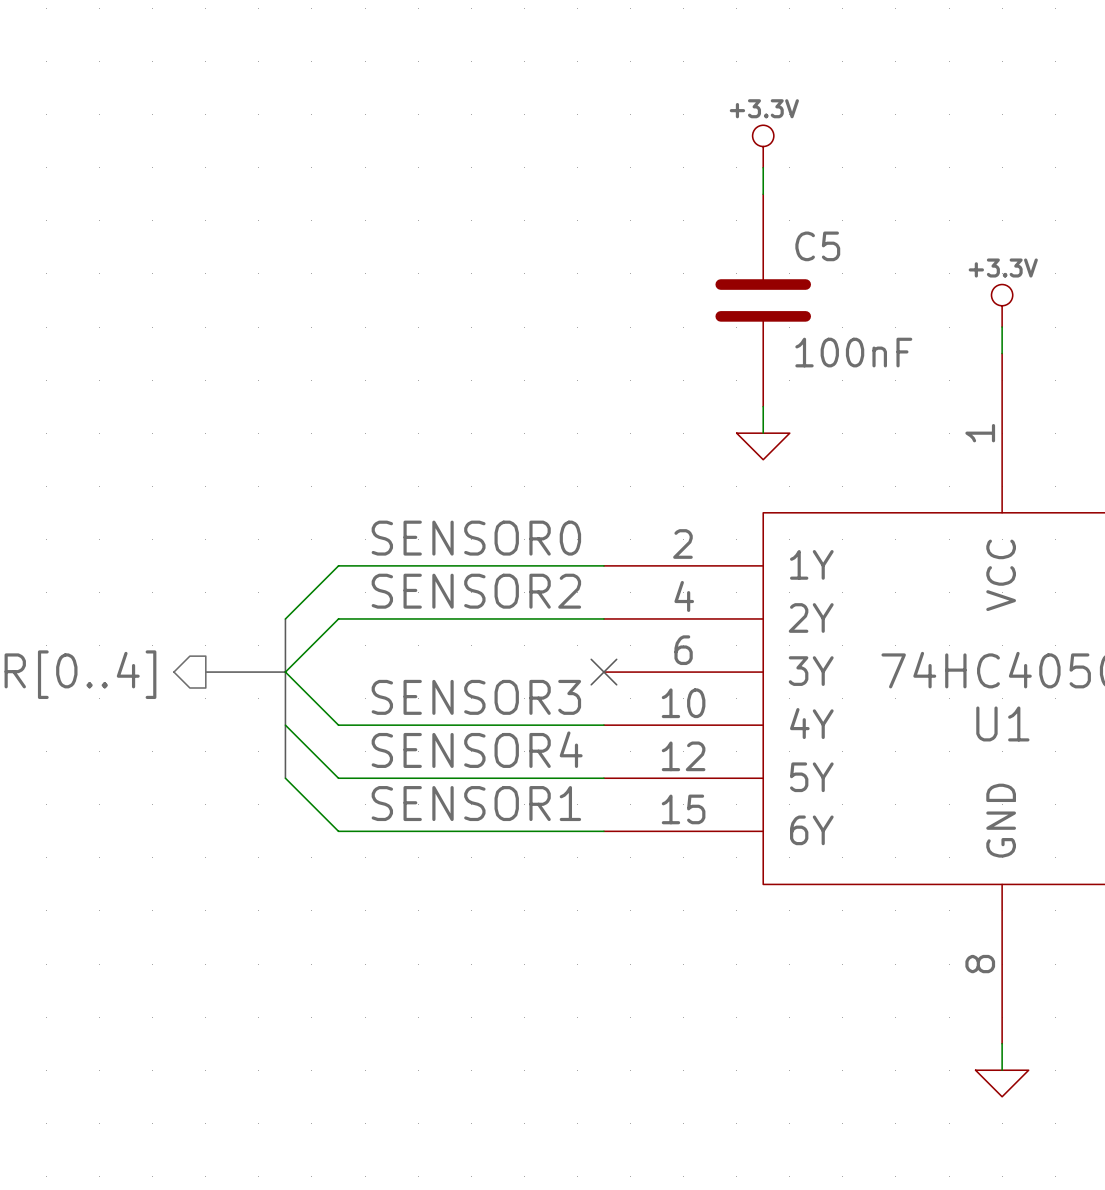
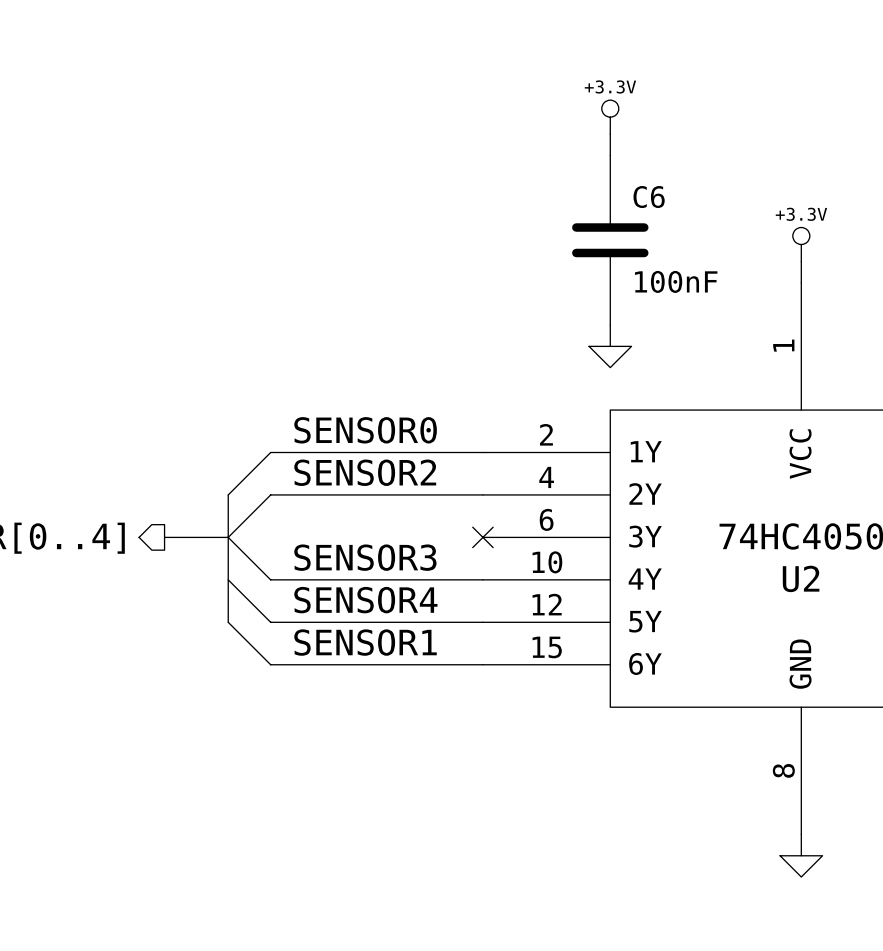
C5 name: C5 (817, 246) -> C6 (649, 197)
U1 name: U1 (1002, 723) -> U2 (801, 578)

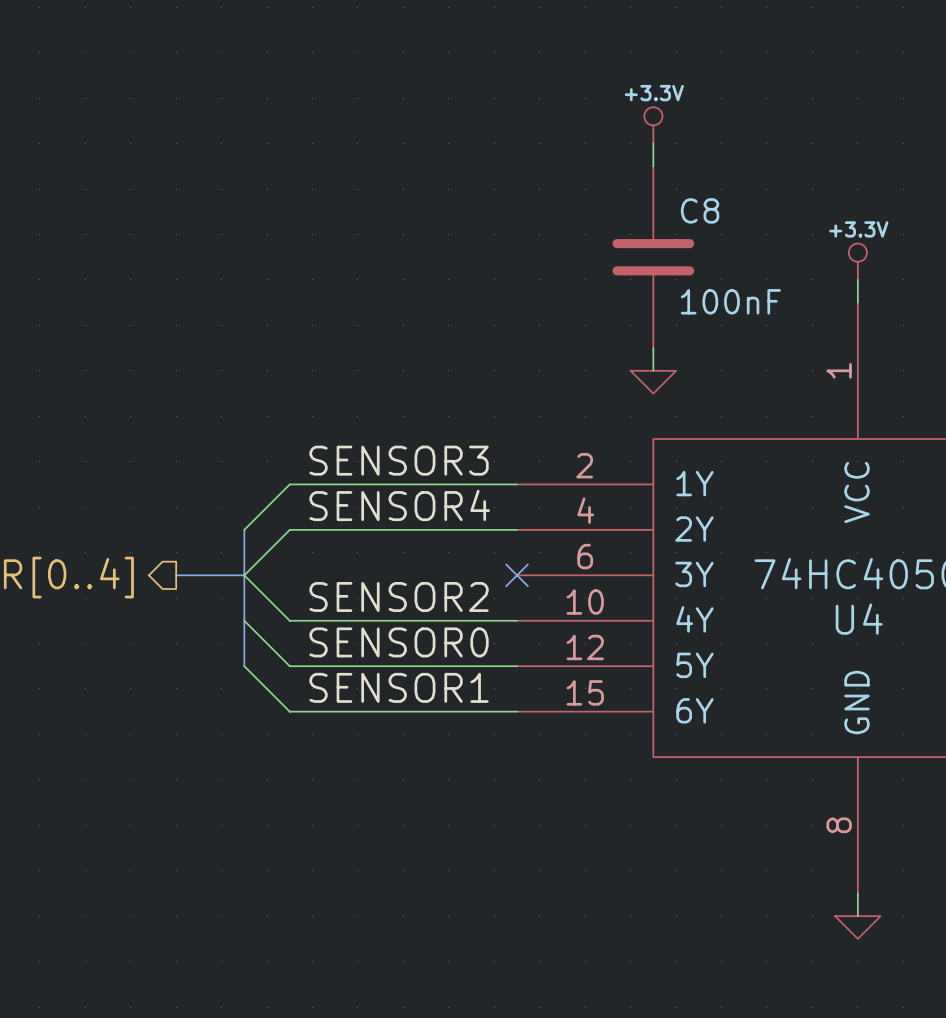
C6 name: C6 (649, 197) -> C8 (700, 210)
label position: SENSOR0 (365, 430) -> SENSOR0 (399, 642)
label position: SENSOR2 (365, 472) -> SENSOR2 (399, 596)
label position: SENSOR3 (365, 557) -> SENSOR3 (399, 460)
U2 name: U2 (801, 578) -> U4 (859, 619)
label position: SENSOR4 (365, 600) -> SENSOR4 (399, 505)
label position: SENSOR1 (365, 642) -> SENSOR1 (399, 687)

